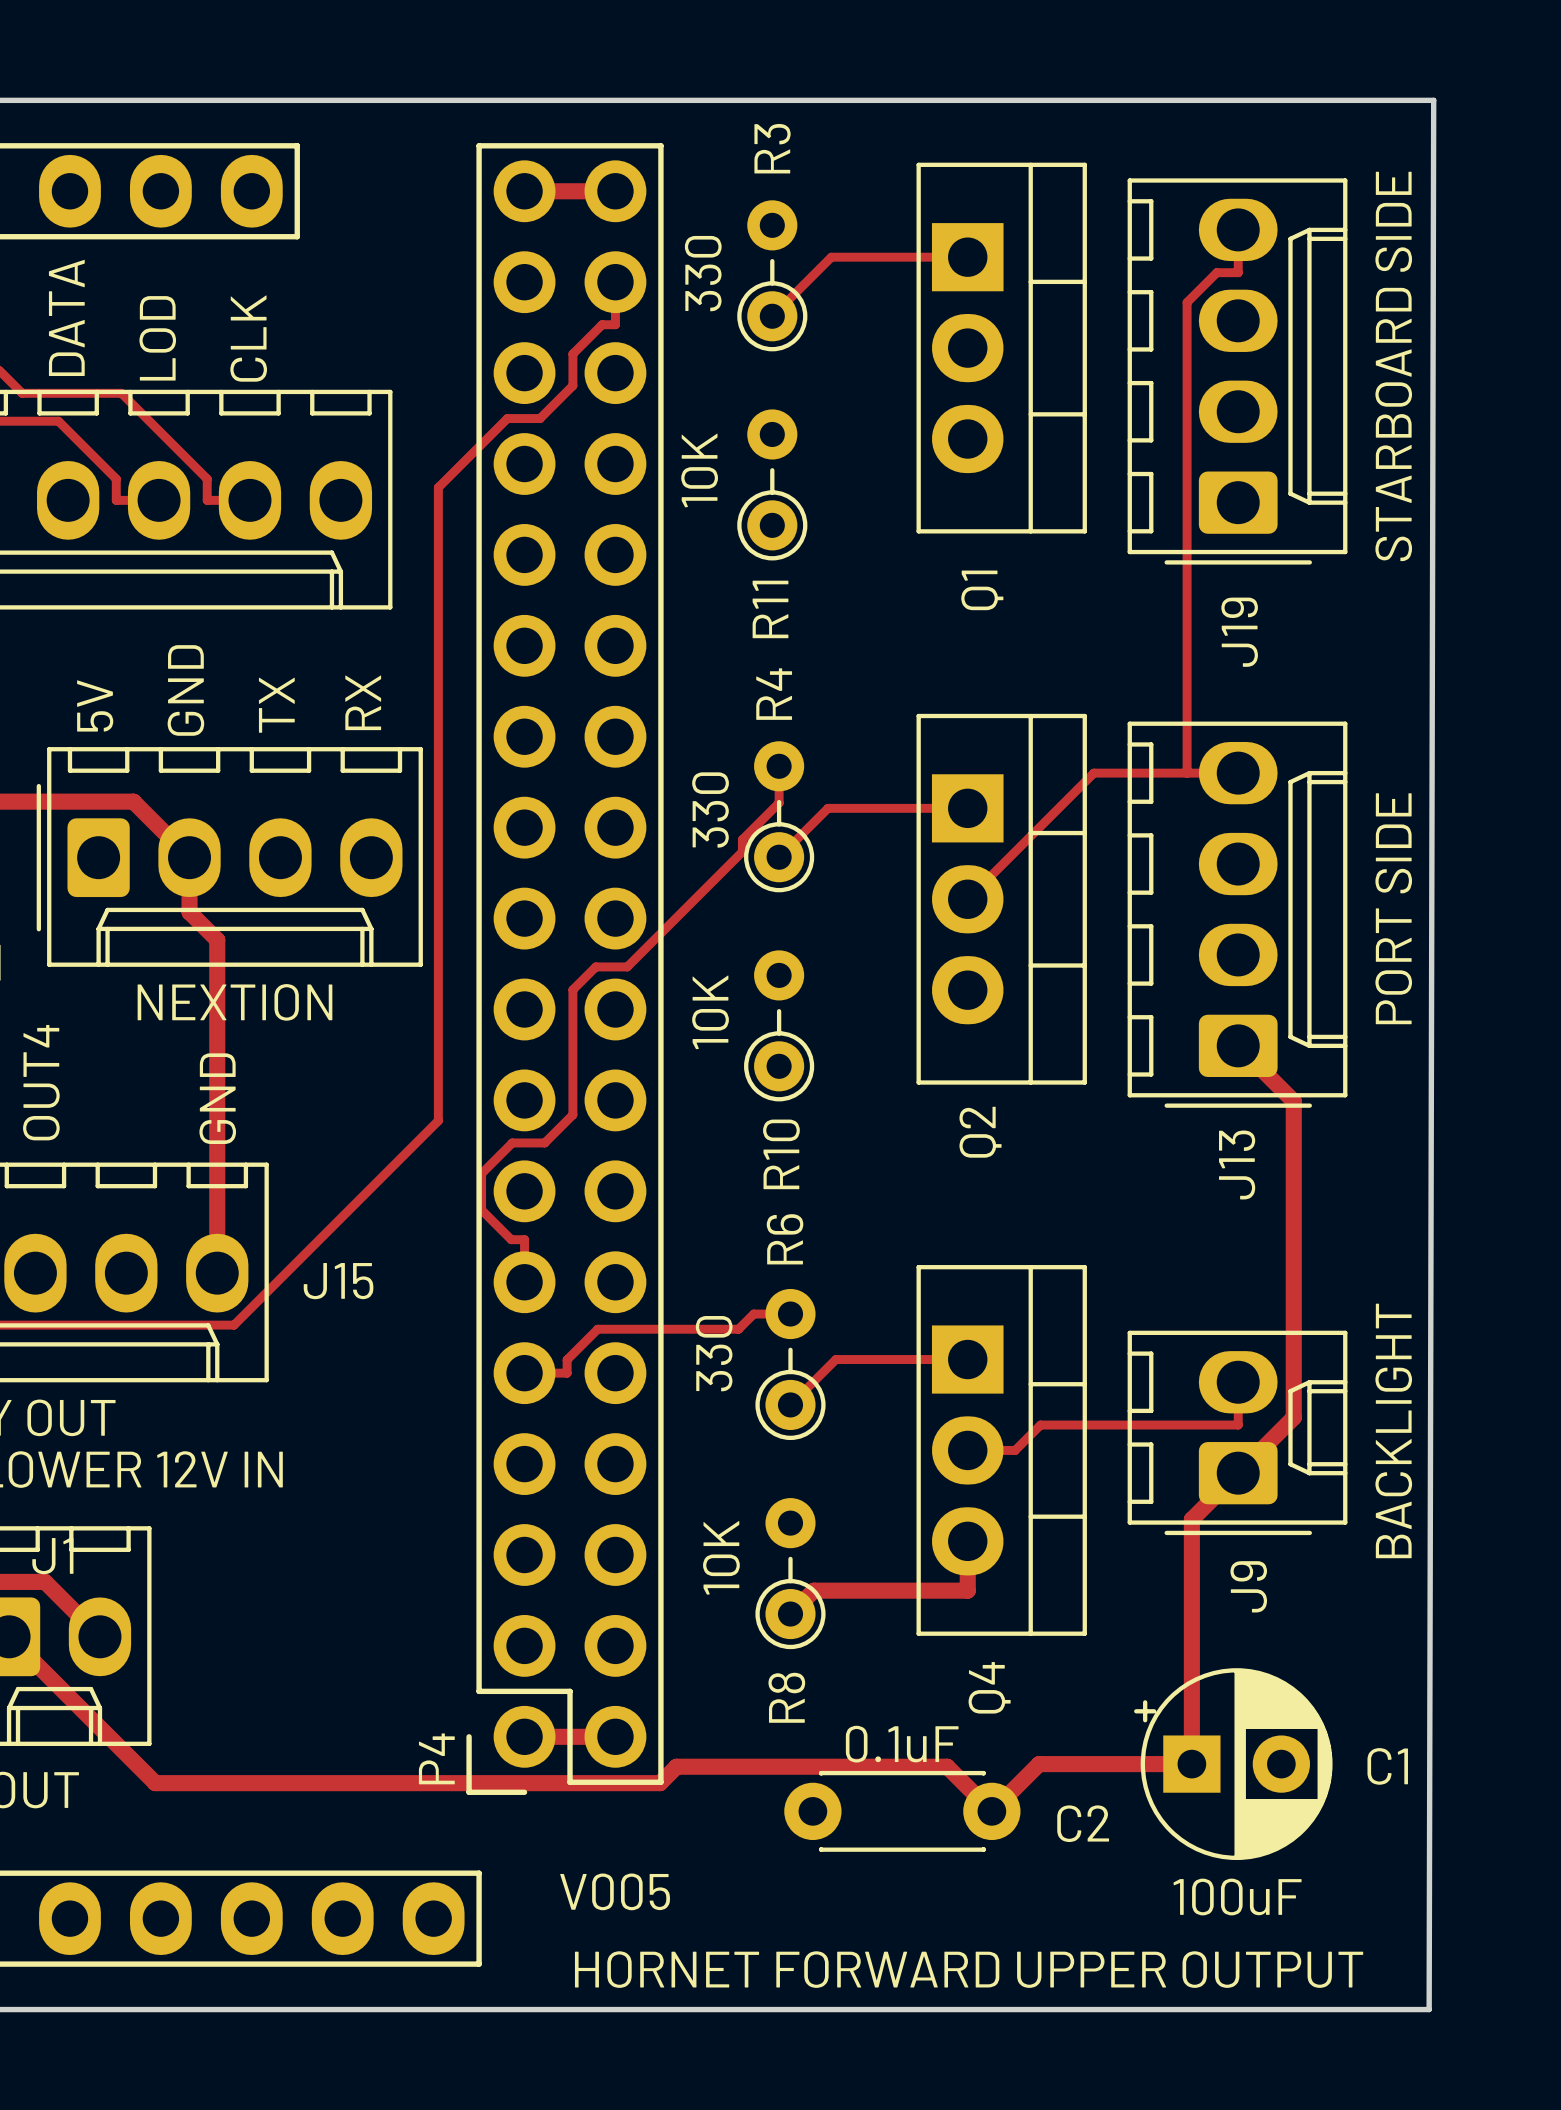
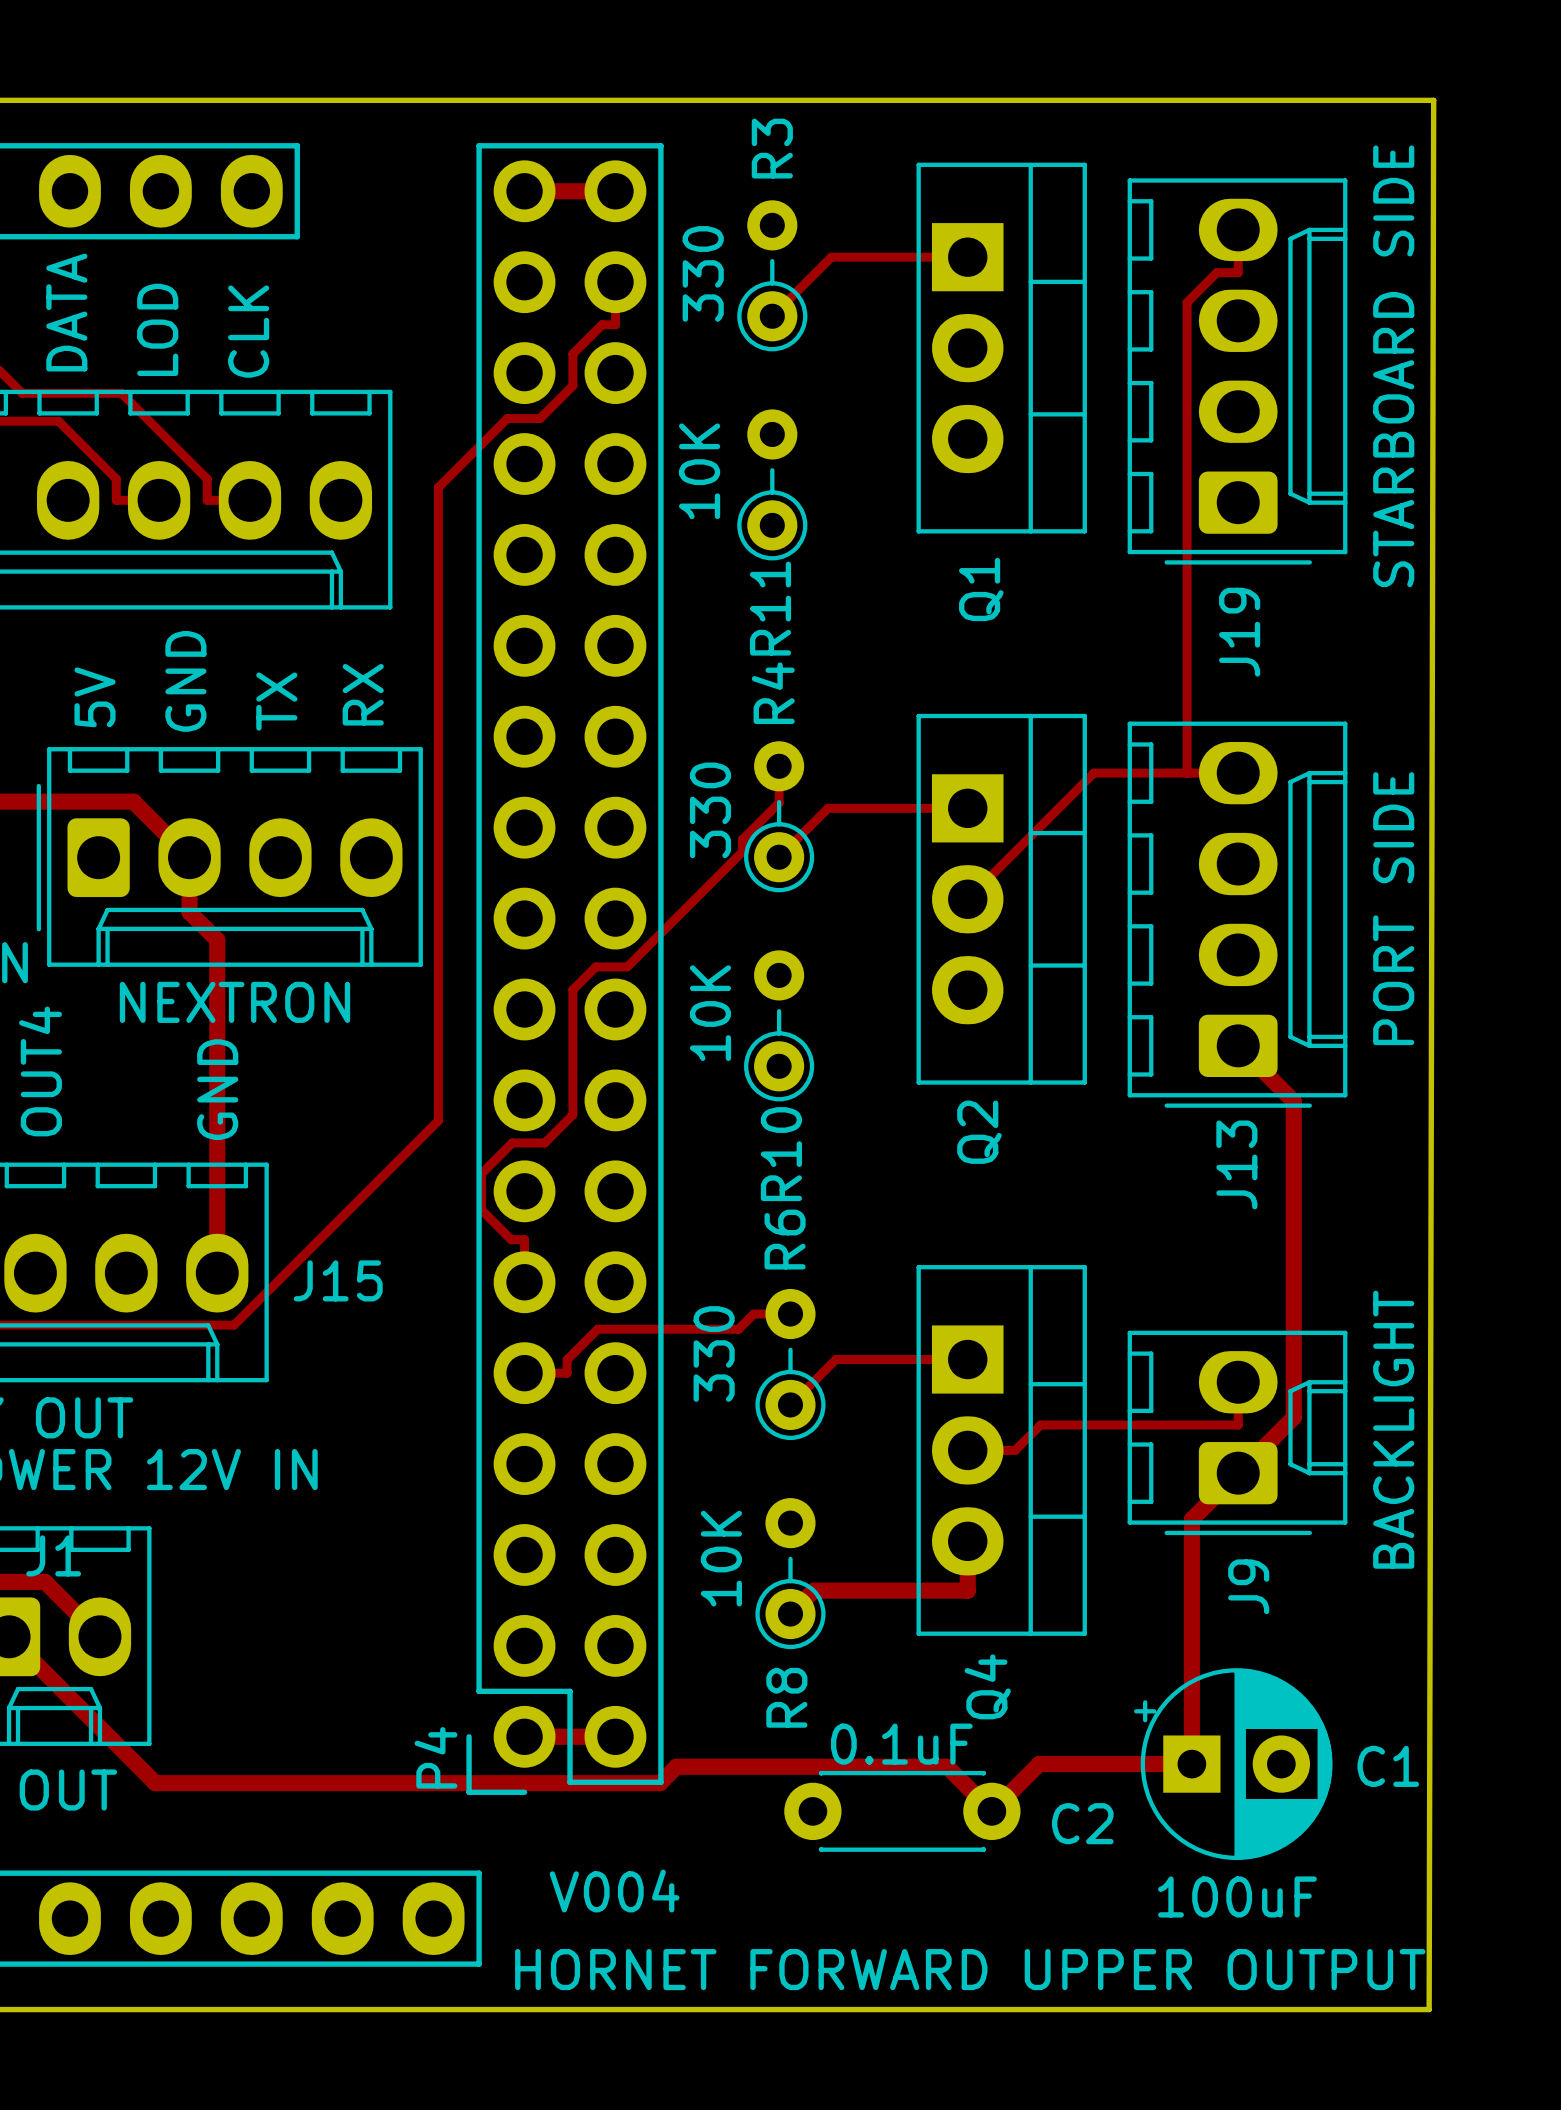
part value: NEXTION (234, 1002) -> NEXTRON (234, 1002)
text: V005 (615, 1891) -> V004 (614, 1891)

